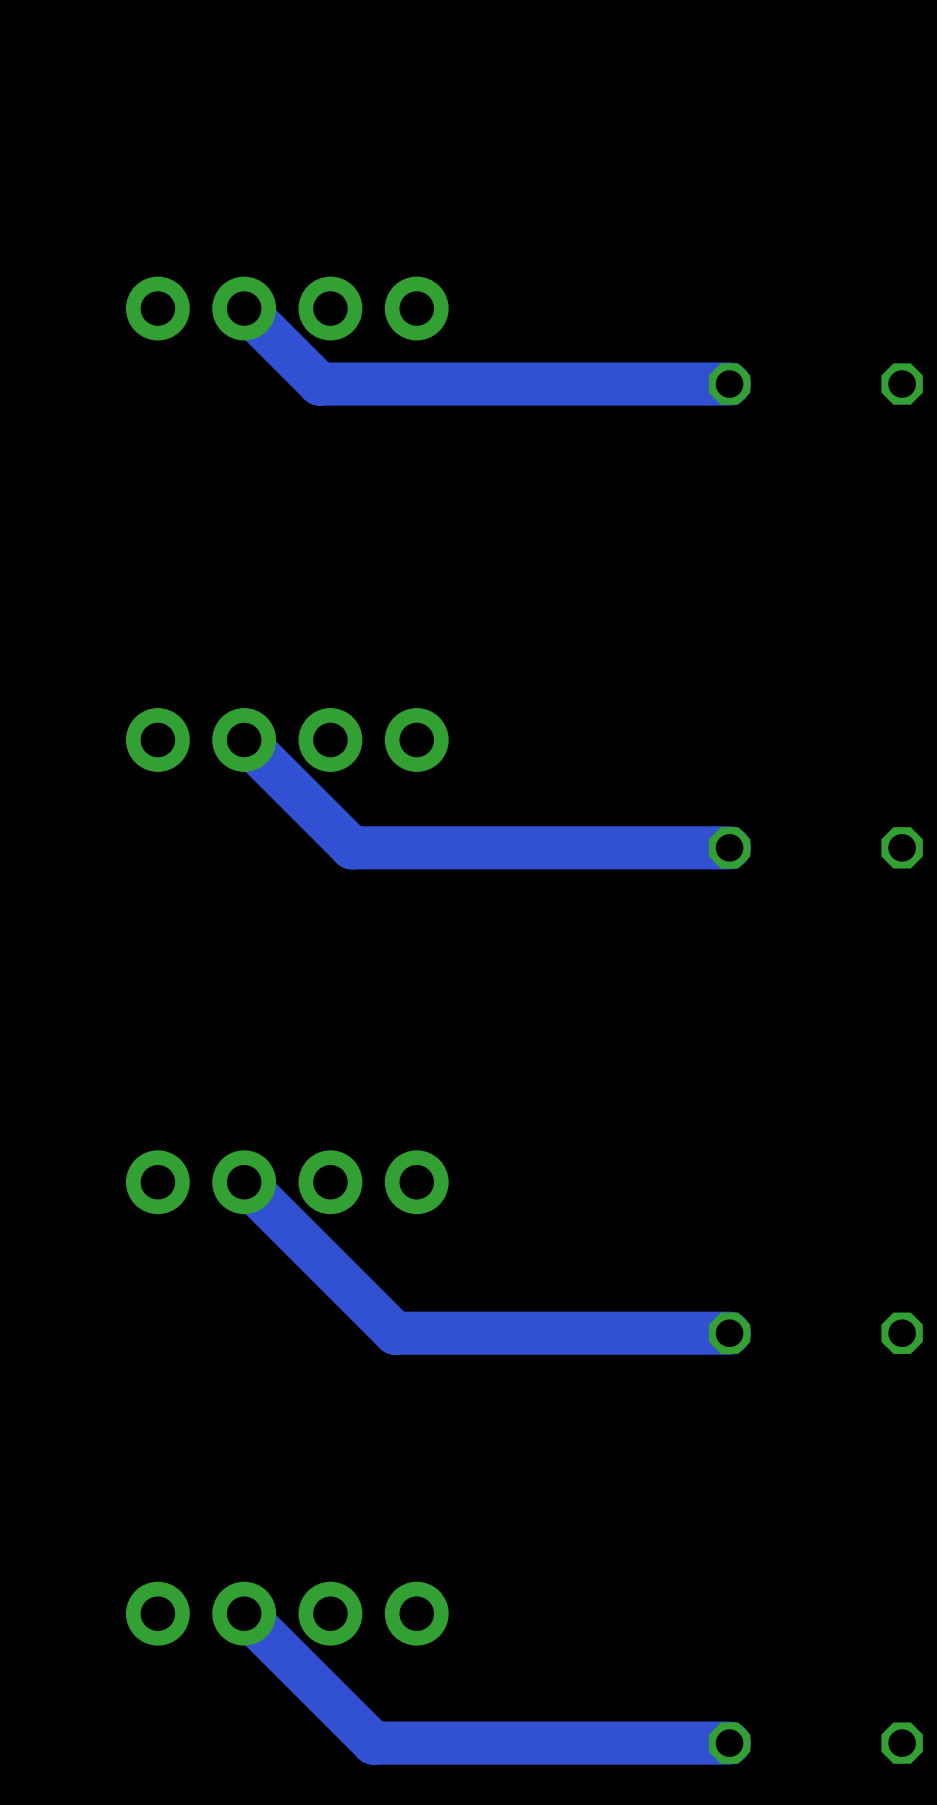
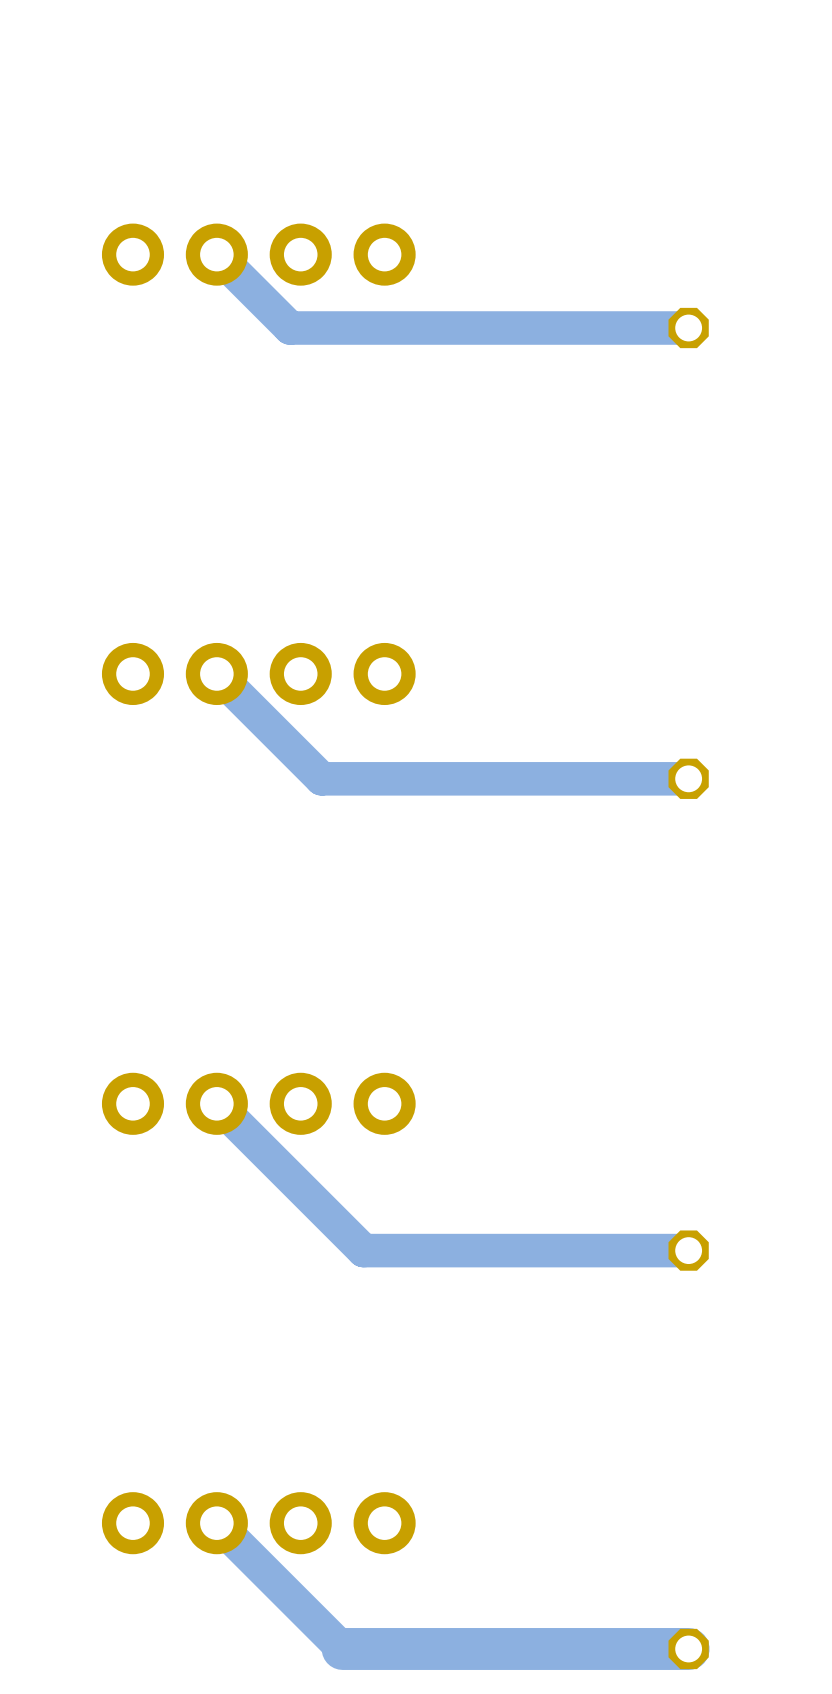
track width: thick (244, 308) (319, 384) (729, 384) -> thin (216, 254) (290, 328) (688, 328)
track width: thick (244, 739) (352, 847) (729, 847) -> thin (216, 673) (321, 778) (688, 778)
track width: thick (244, 1182) (395, 1333) (729, 1333) -> thin (216, 1103) (363, 1250) (688, 1250)
track width: thick (244, 1613) (373, 1743) -> thin (216, 1523) (342, 1648)

